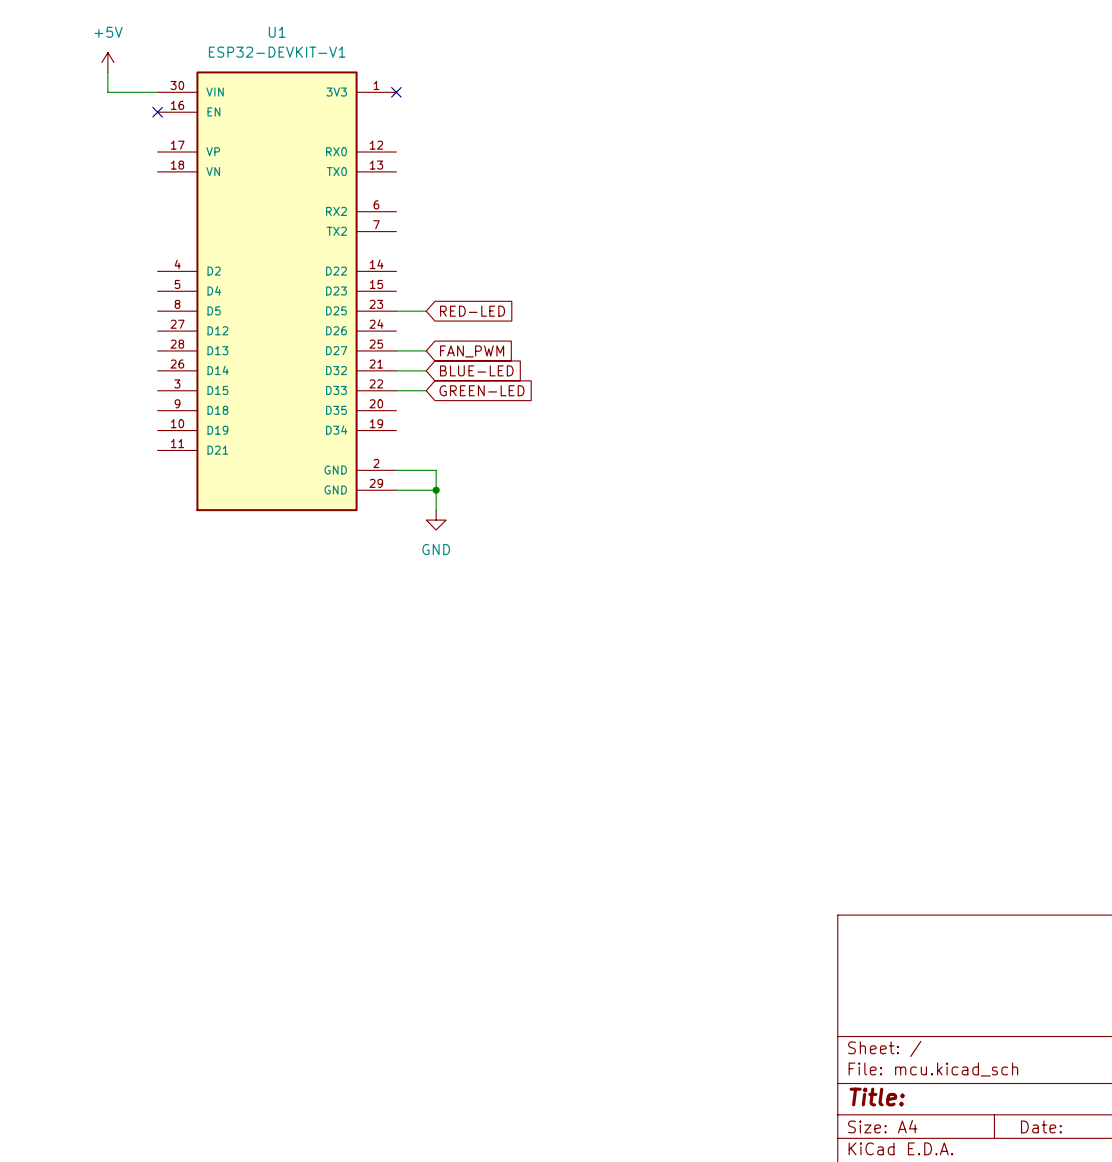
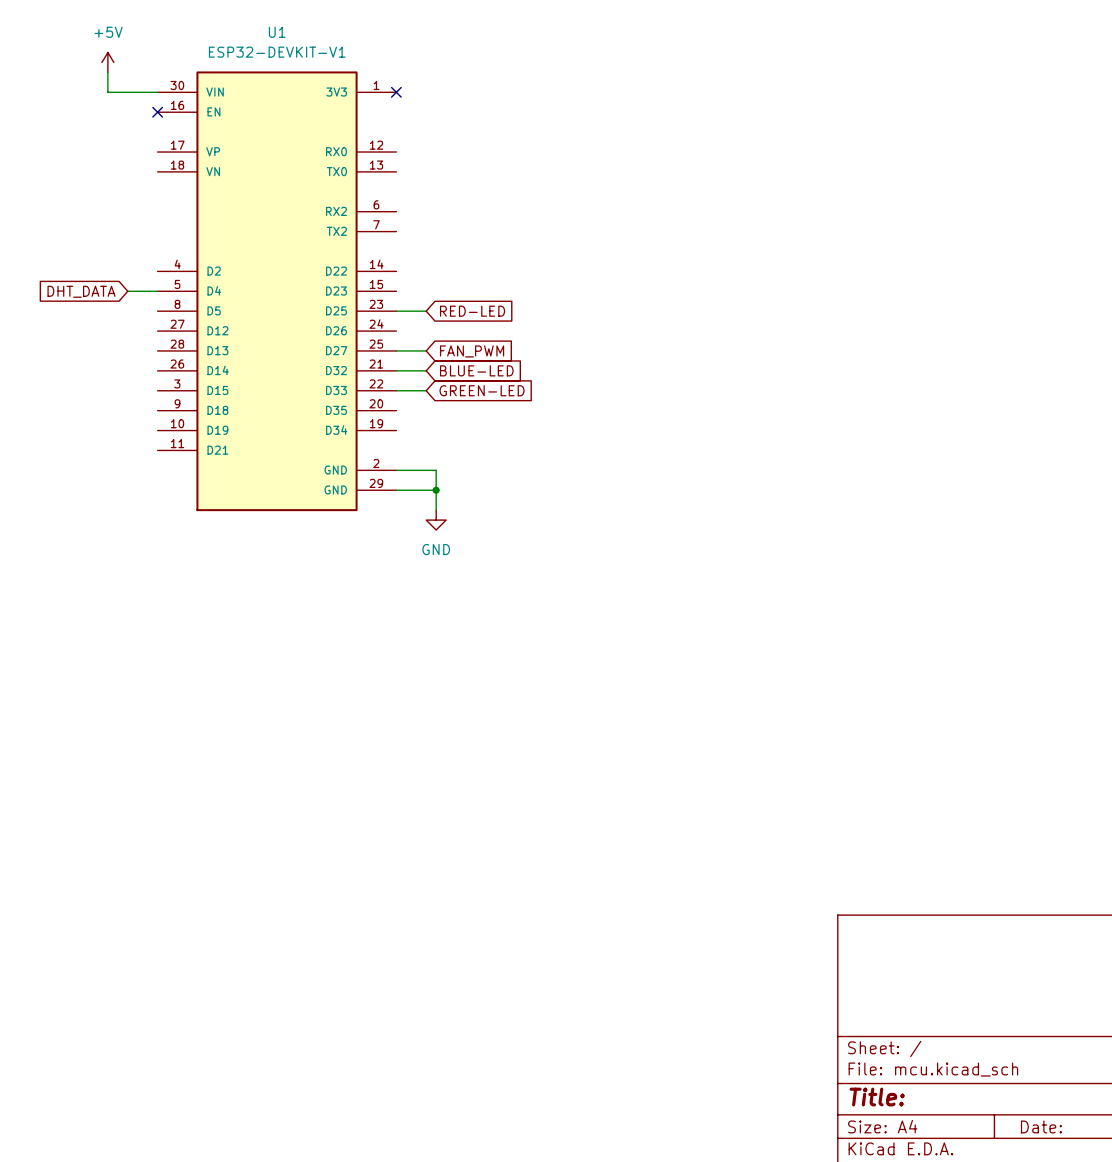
global label: none -> DHT_DATA (81, 291)
wire: none -> (127, 291) (157, 291)

